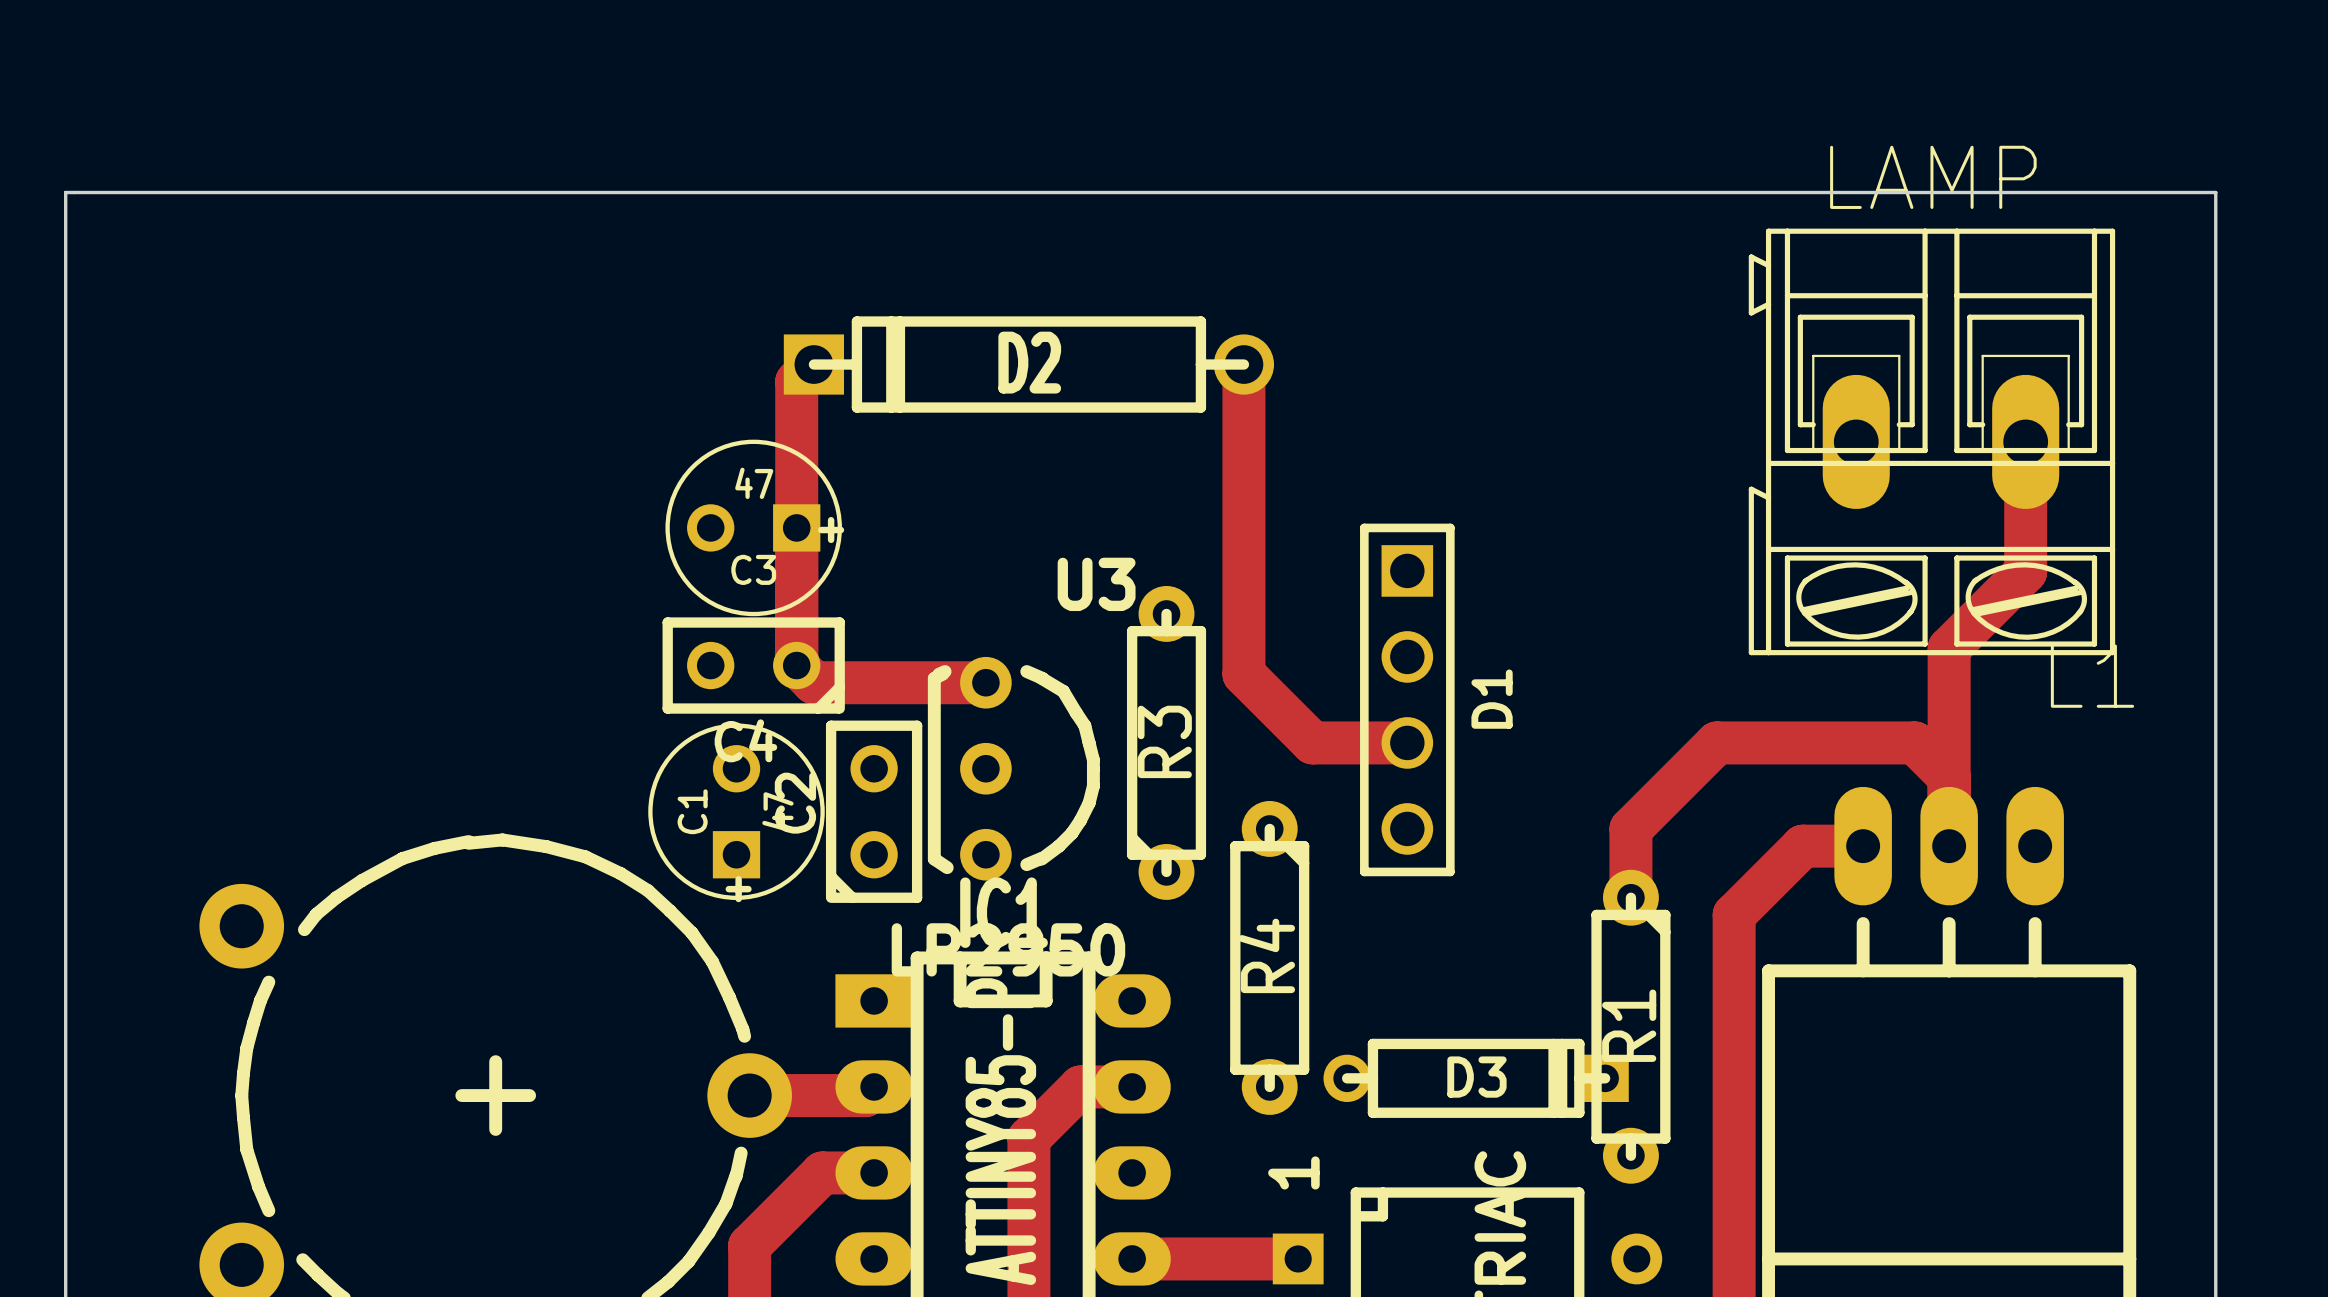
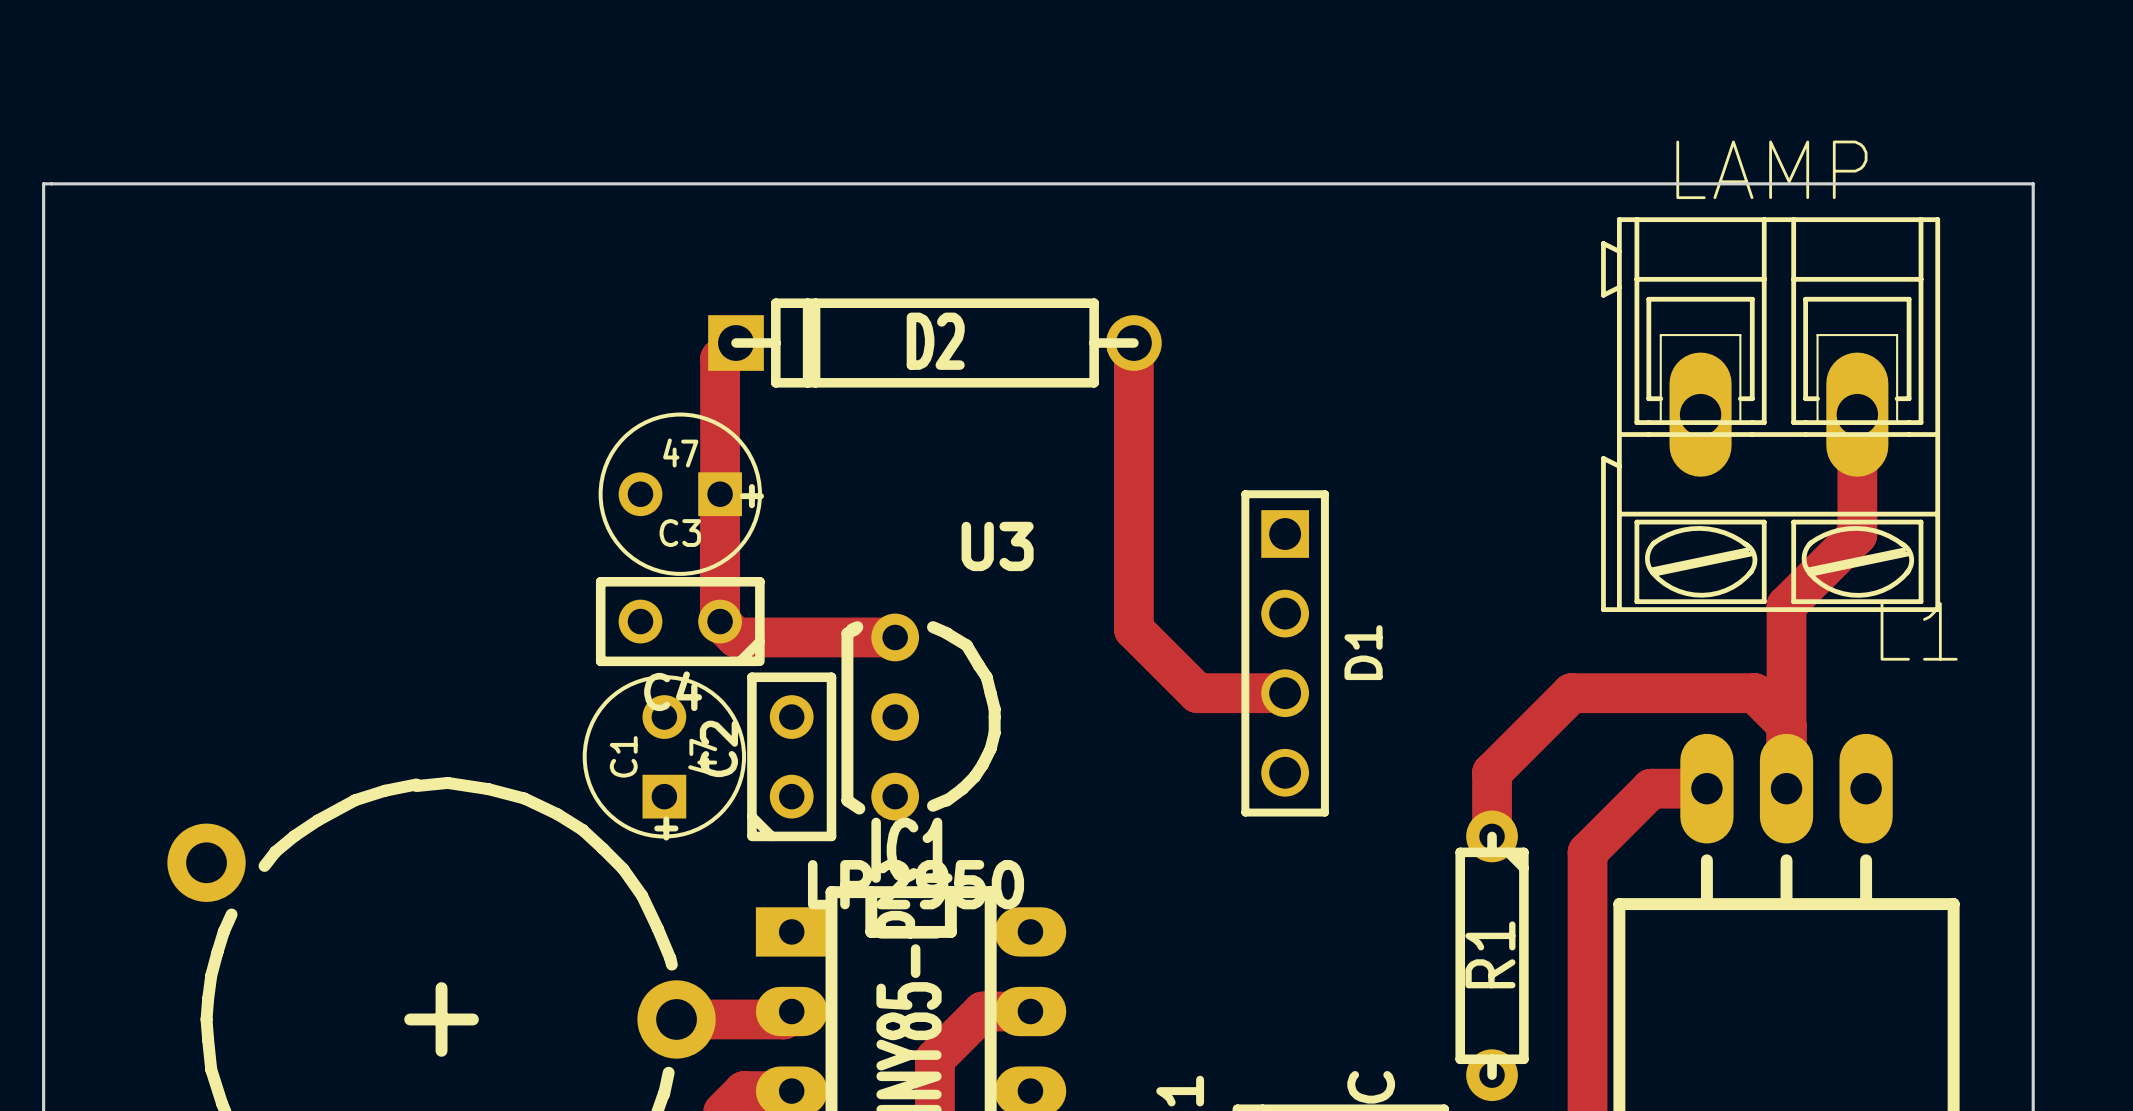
R3: (1166, 742) -> none
R4: (1269, 957) -> none
D3: (1476, 1078) -> none

